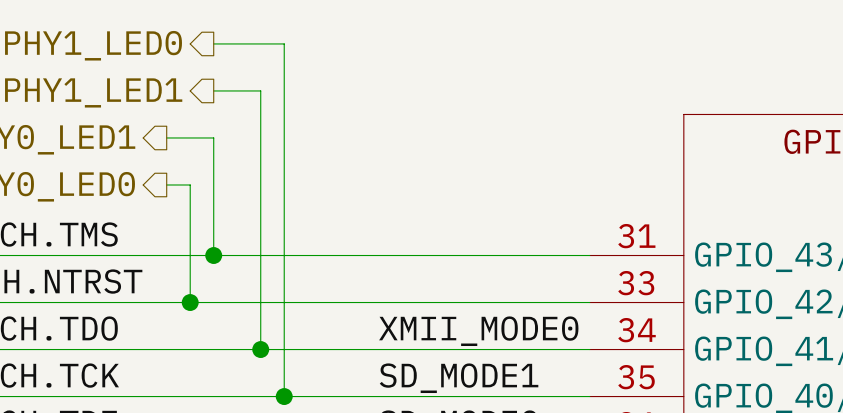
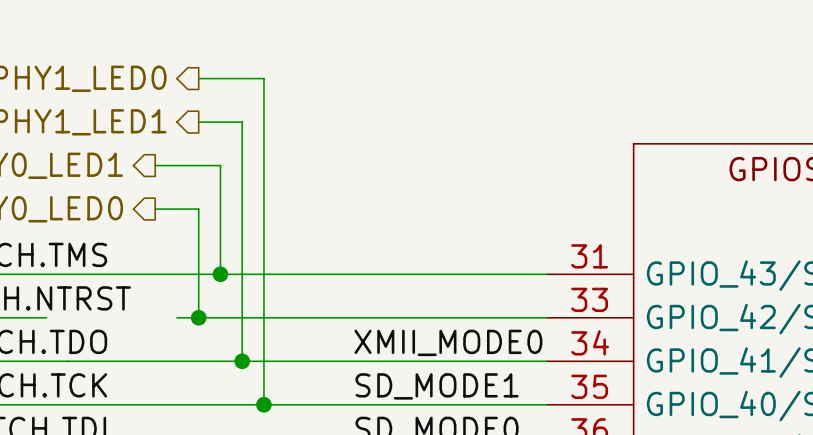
wire: (213, 137) (213, 184) -> (176, 209) (198, 209)
wire: none -> (198, 165) (220, 165) (220, 274)
wire: (190, 184) (190, 302) (49, 302) -> none
wire: none -> (198, 274) (198, 317)
junction: (213, 255) -> none
junction: none -> (220, 274)
junction: (190, 302) -> none
junction: none -> (198, 317)

